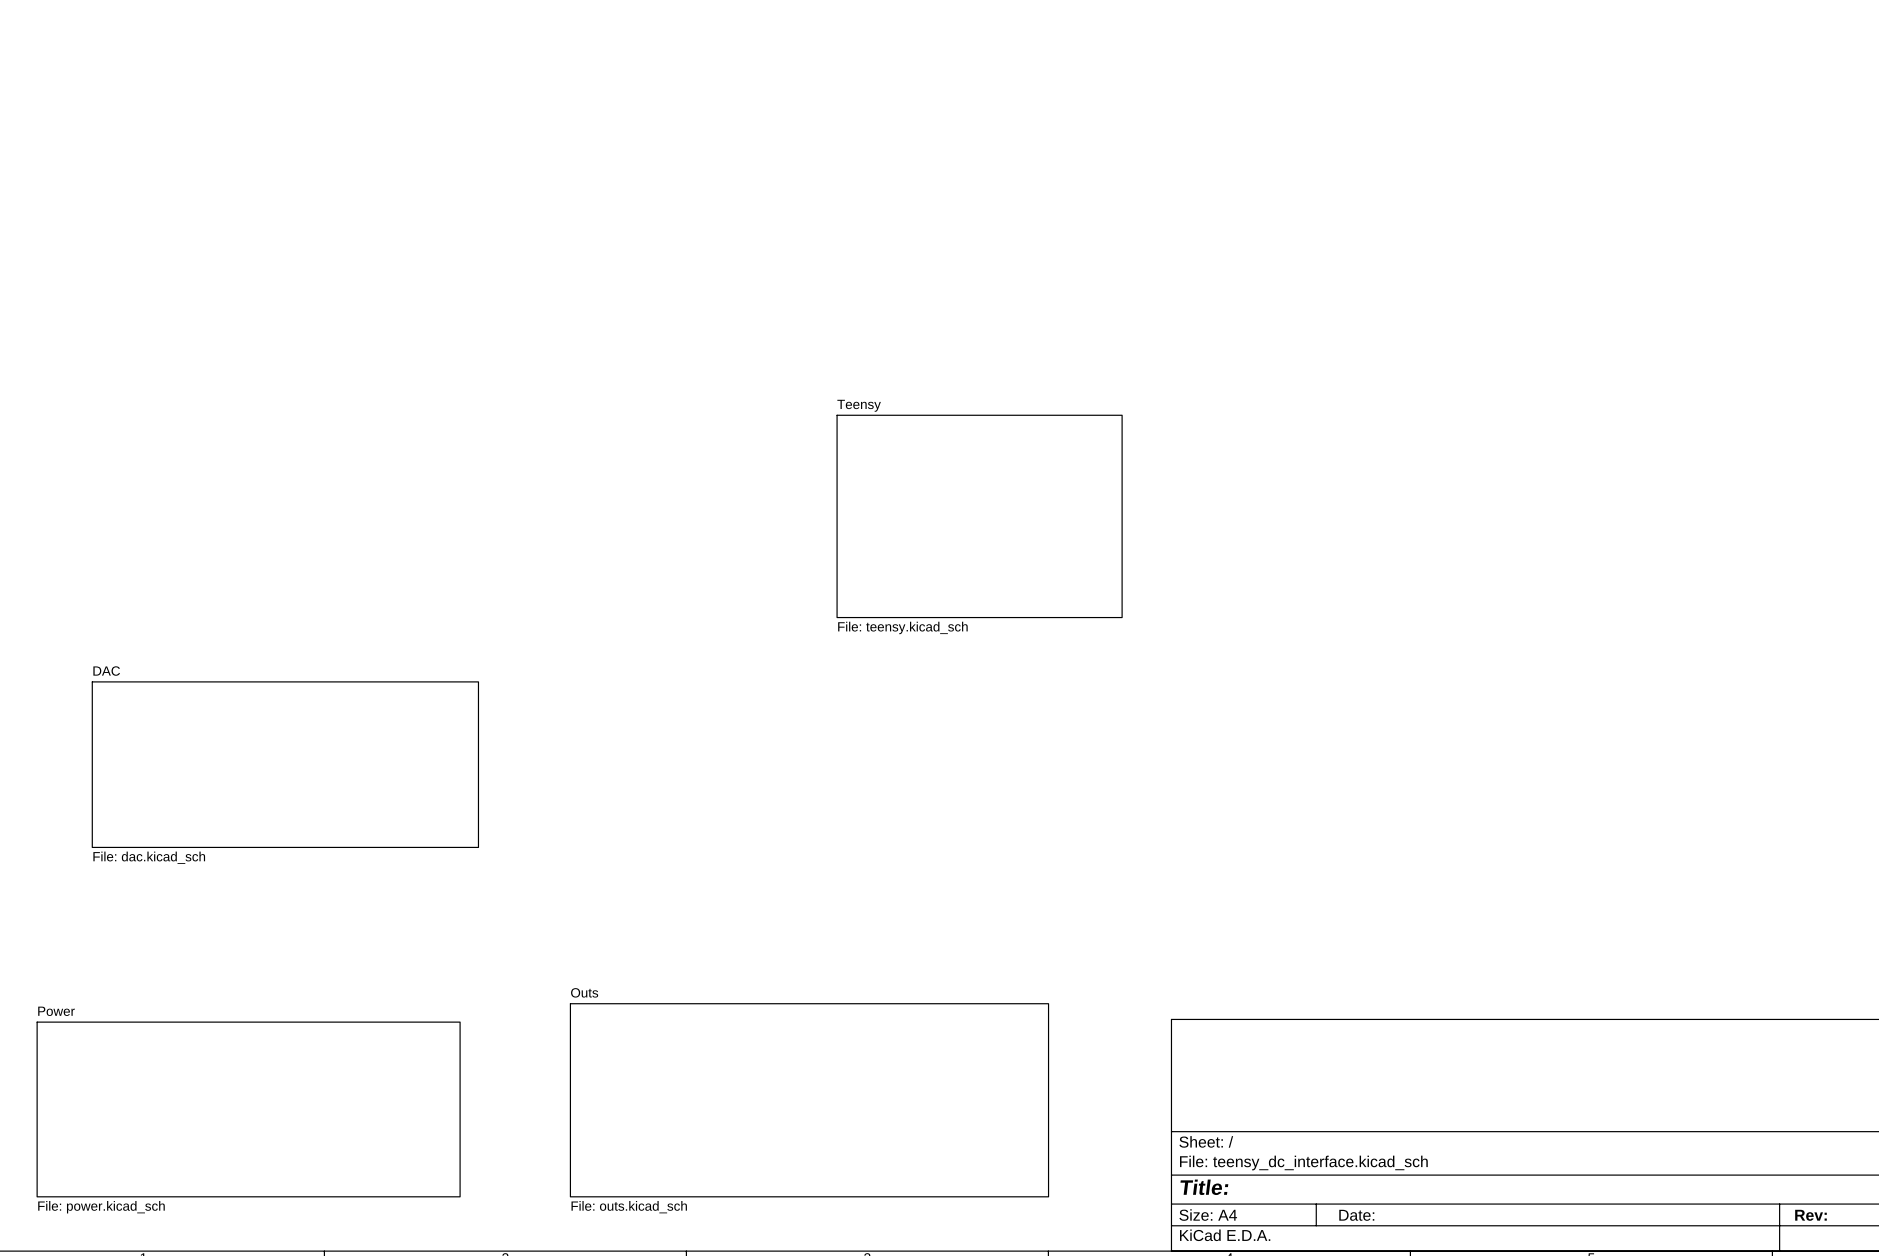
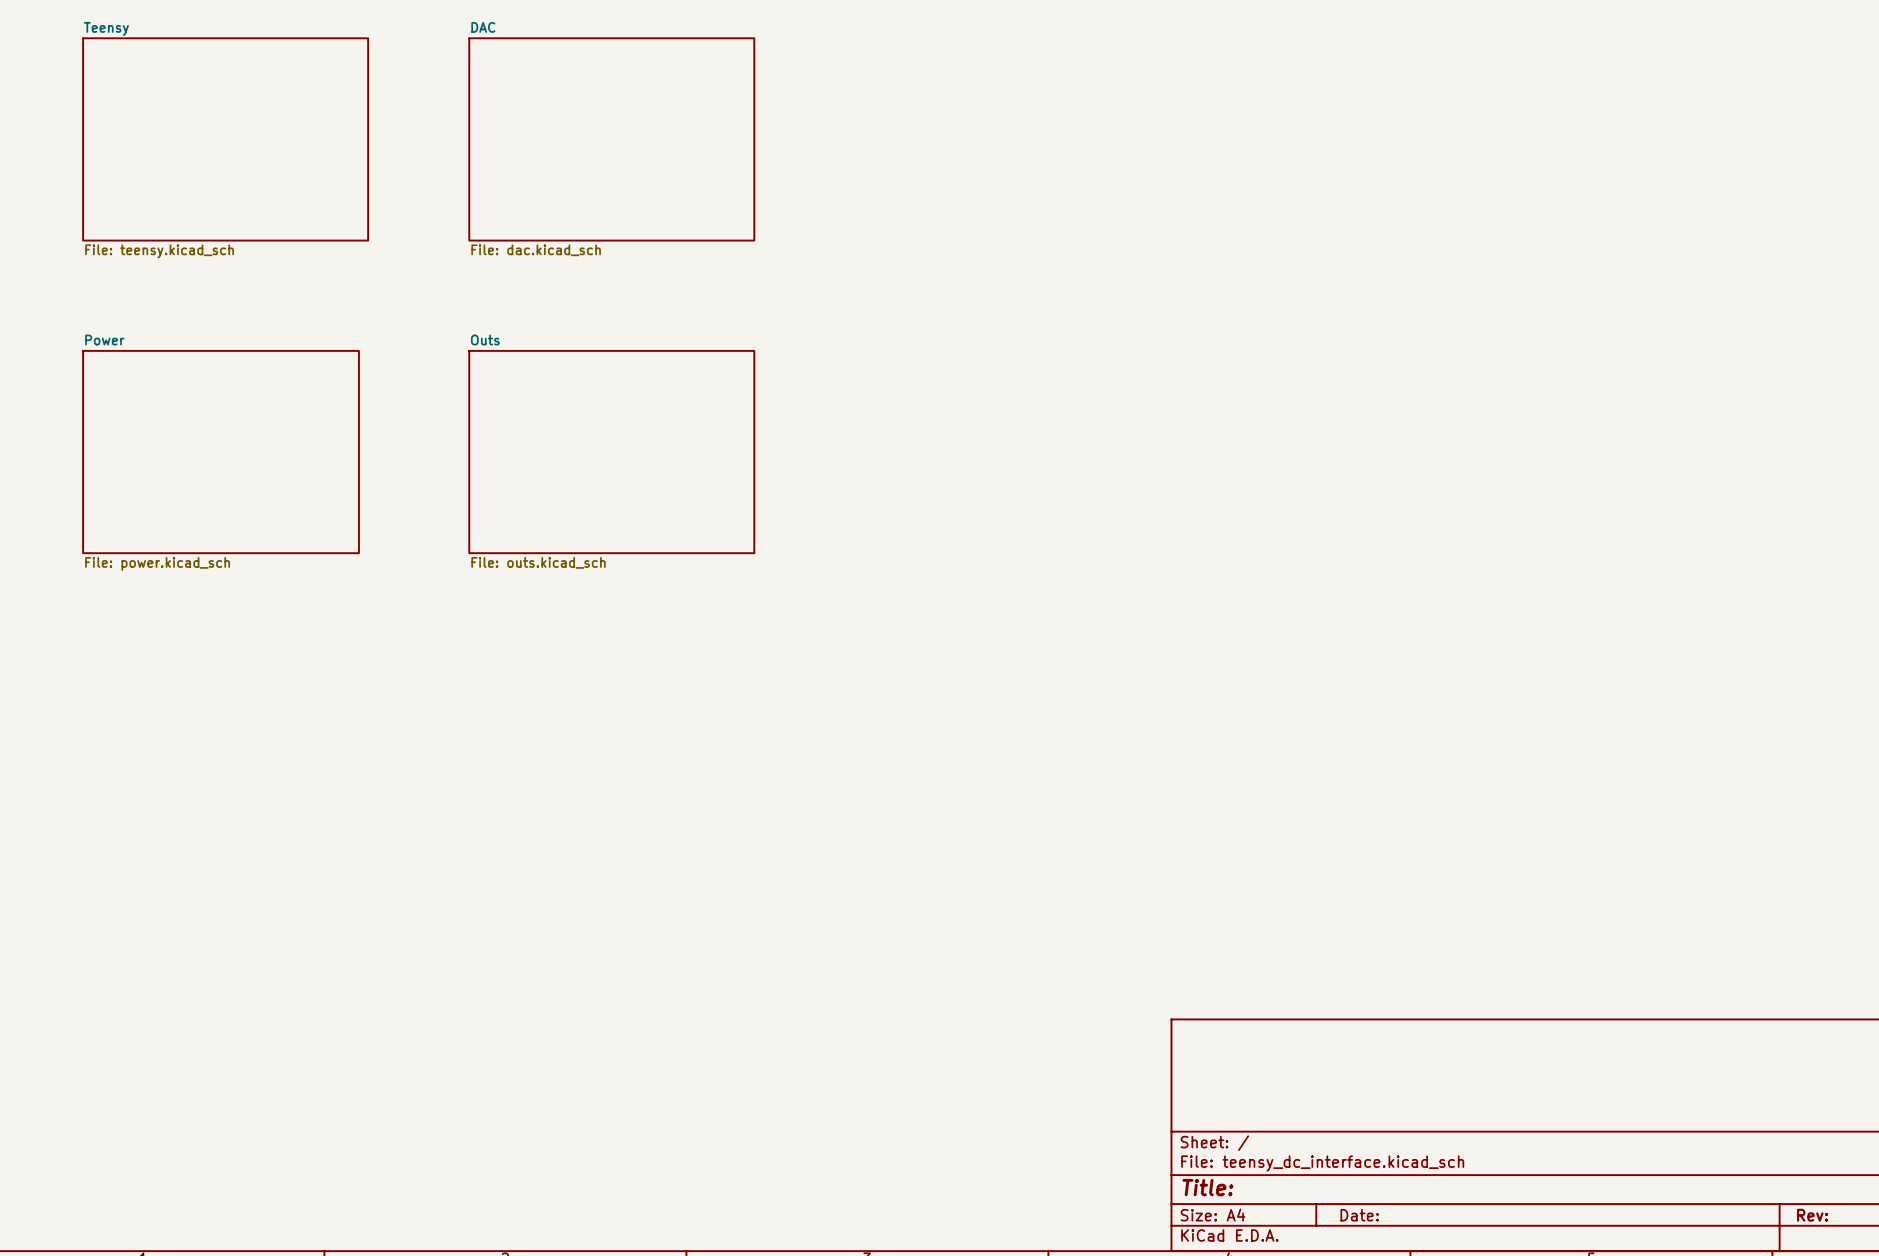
sheet Teensy: none -> File: teensy.kicad_sch (225, 139)
sheet DAC: none -> File: dac.kicad_sch (611, 139)
sheet Power: none -> File: power.kicad_sch (221, 452)
sheet Outs: none -> File: outs.kicad_sch (611, 452)
sheet Teensy: File: teensy.kicad_sch (979, 516) -> none
sheet DAC: File: dac.kicad_sch (285, 764) -> none
sheet Outs: File: outs.kicad_sch (809, 1100) -> none
sheet Power: File: power.kicad_sch (248, 1109) -> none

